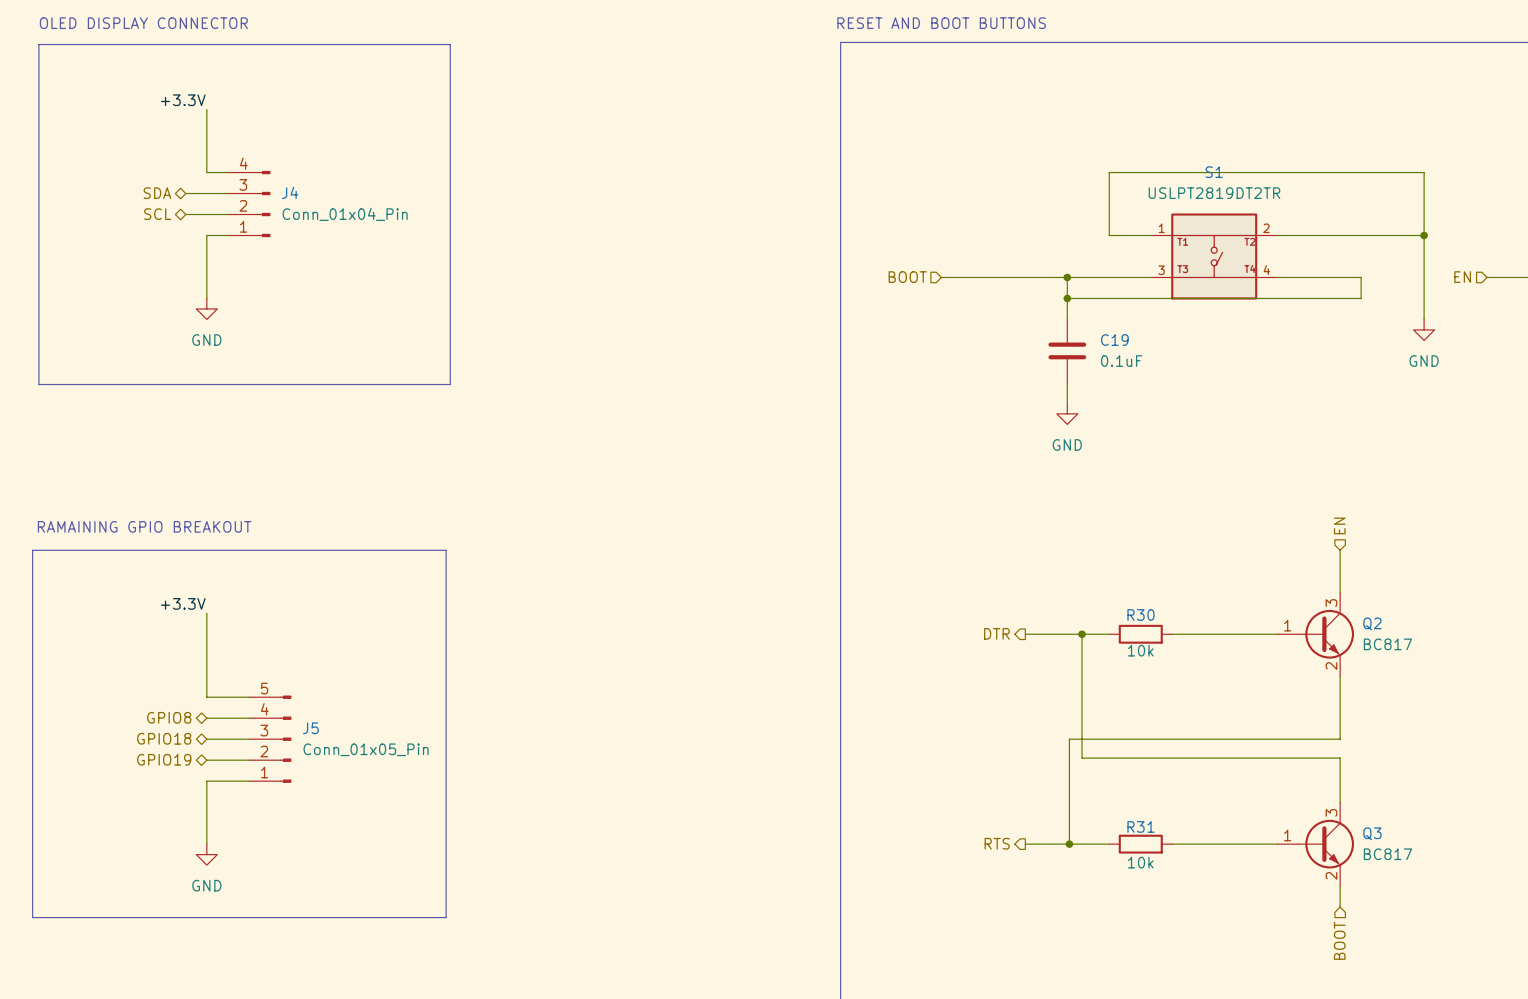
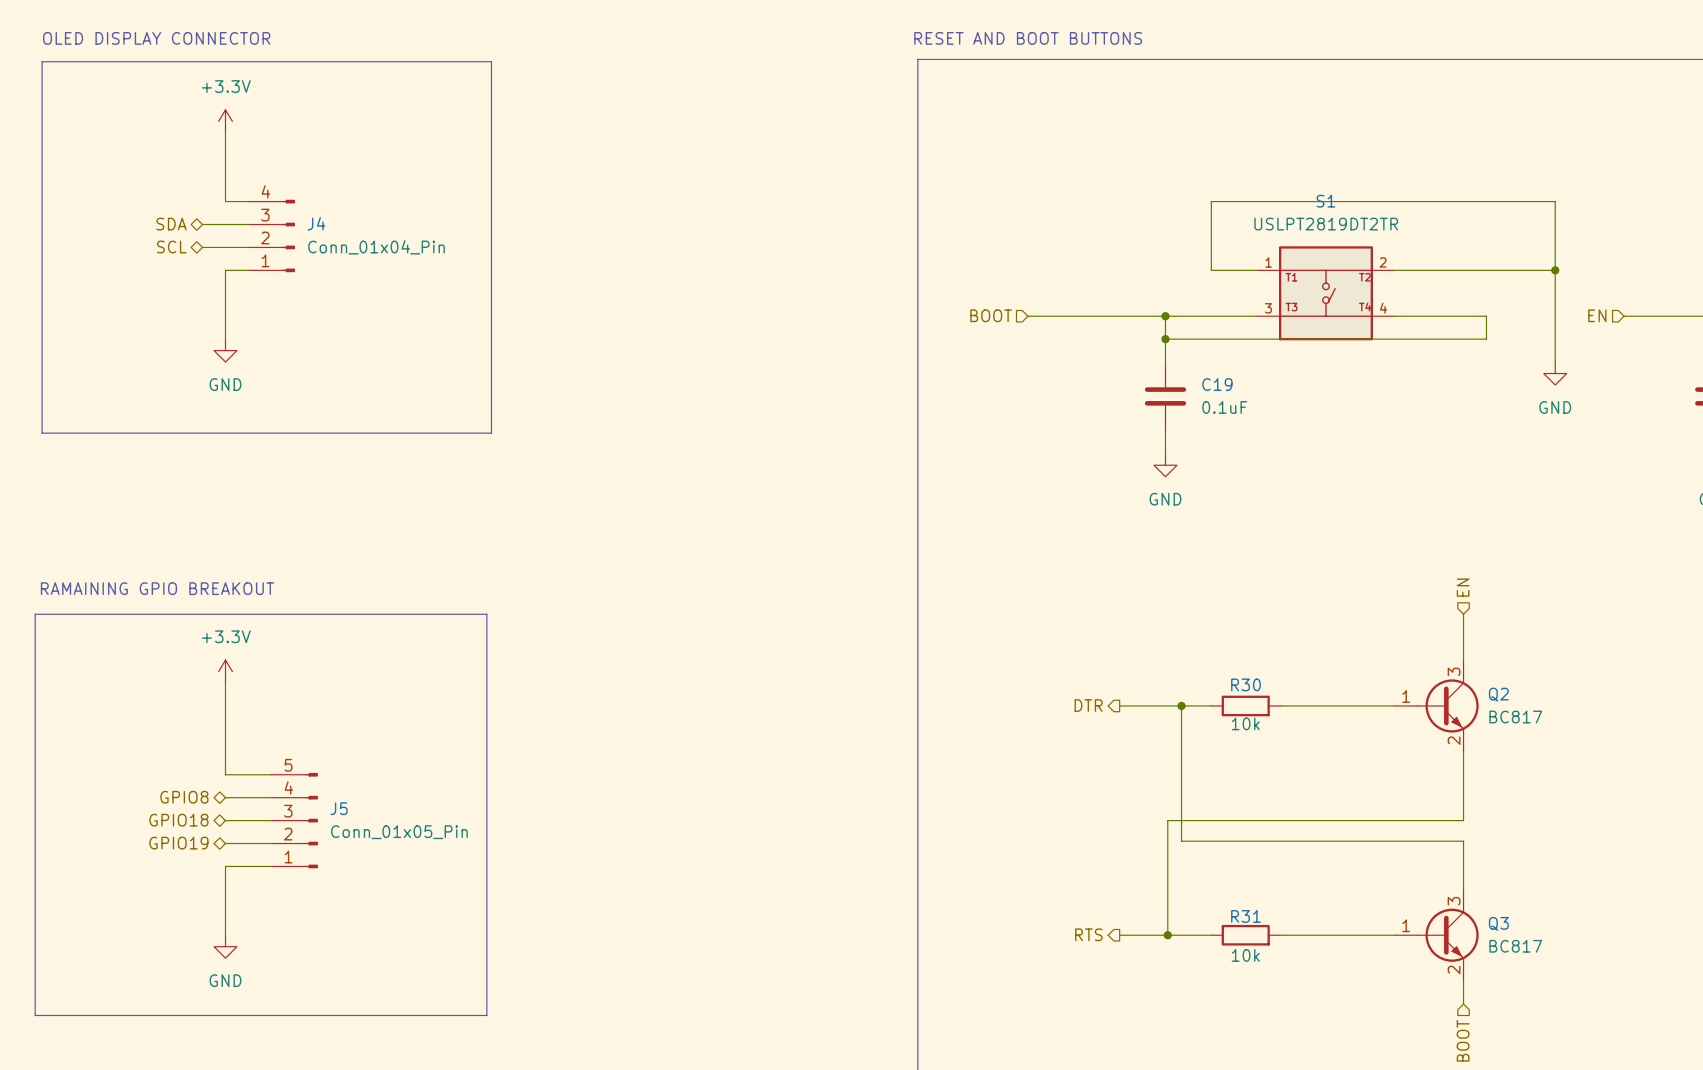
power symbol: none -> +3.3V (225, 121)
label: +3.3V (183, 100) -> none
power symbol: none -> +3.3V (225, 671)
label: +3.3V (183, 603) -> none

